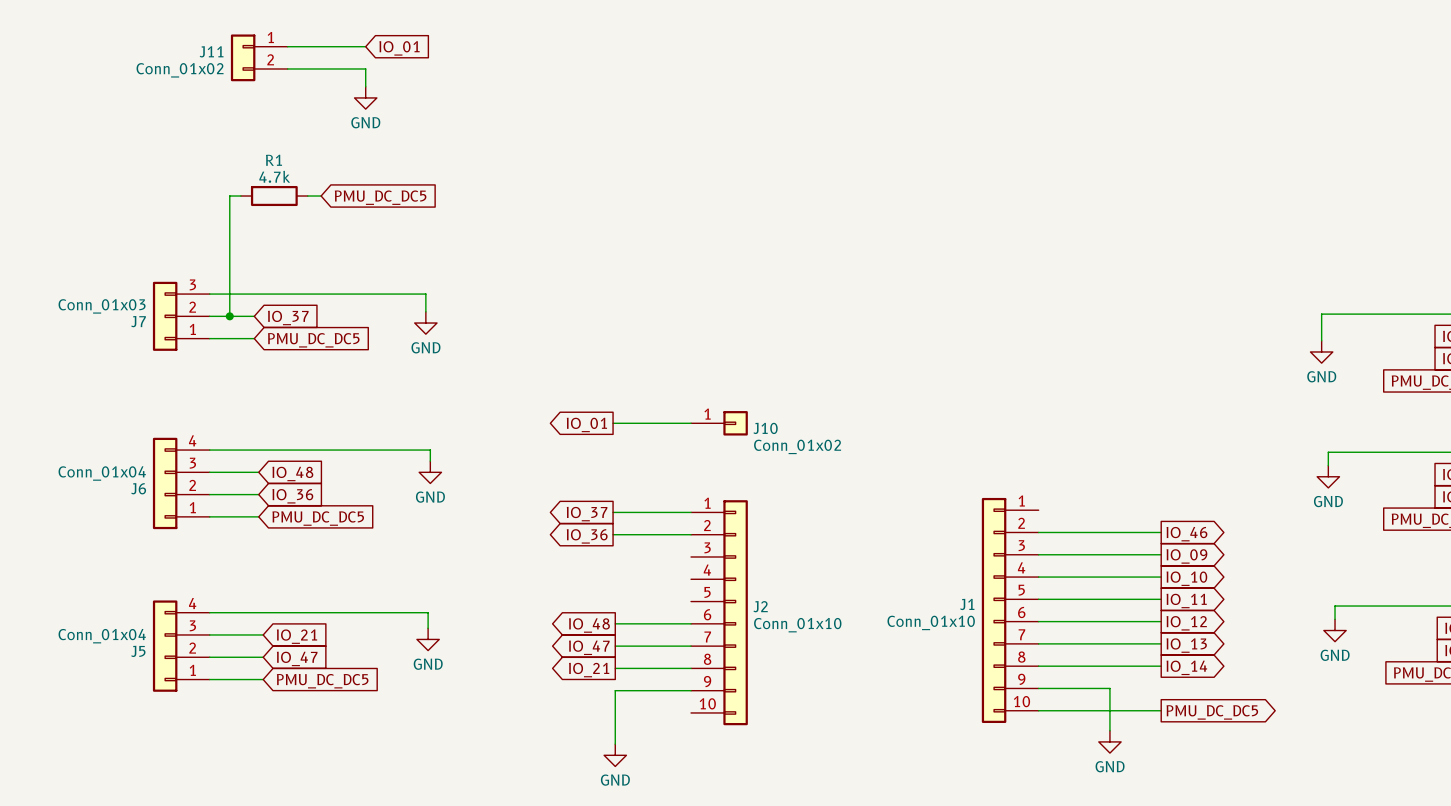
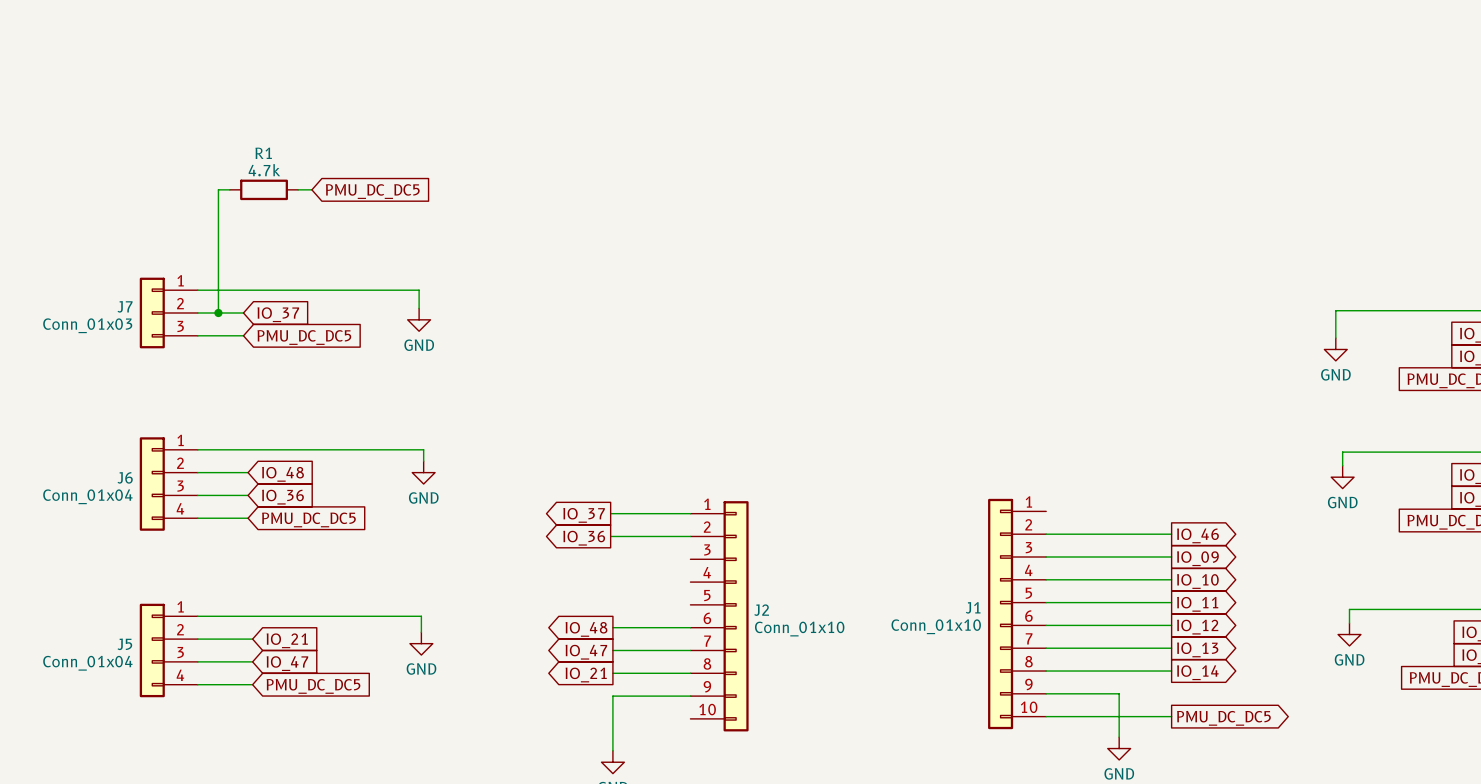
wire: (287, 46) (365, 46) -> none
global label: IO_01 (399, 48) -> none
J11: Conn_01x02 (259, 57) -> none
wire: (287, 68) (365, 68) (365, 86) -> none
power symbol: GND (365, 97) -> none
J7 flip: as is (165, 316) -> up-down (152, 312)
wire: (613, 423) (691, 423) -> none
J10: Conn_01x02 (719, 423) -> none
global label: IO_01 (586, 424) -> none
J6 flip: as is (165, 483) -> up-down (152, 484)
J5 flip: as is (165, 646) -> up-down (152, 650)

